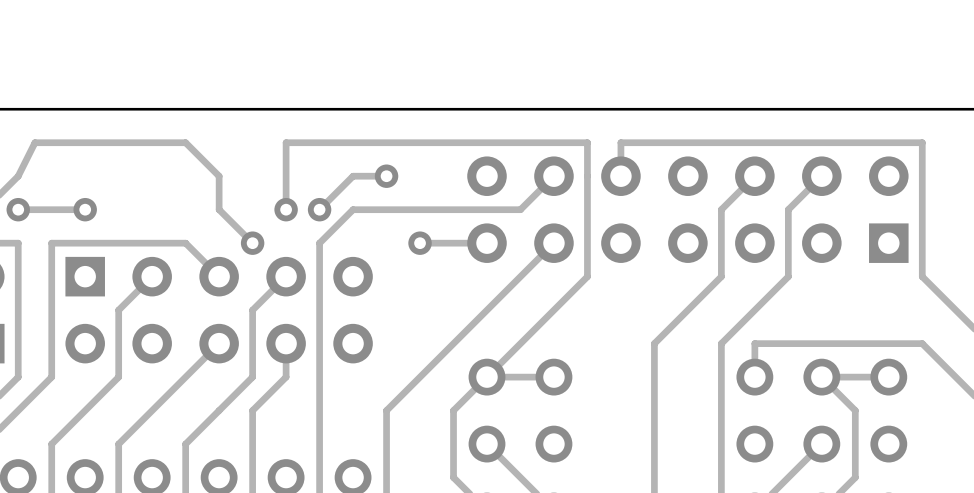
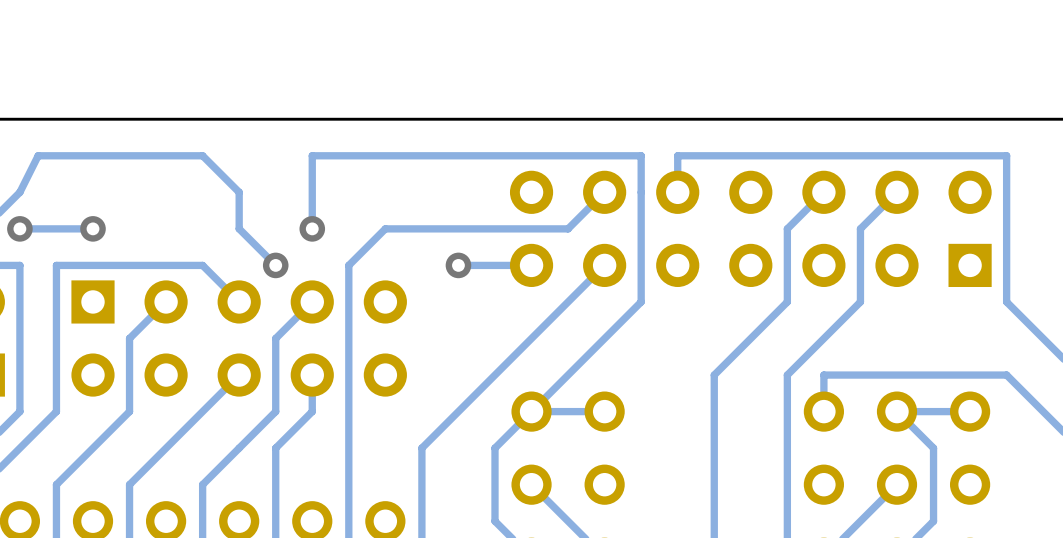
track: (386, 176) (353, 176) (319, 209) -> none
via: (386, 176) -> none
via: (319, 209) -> none

